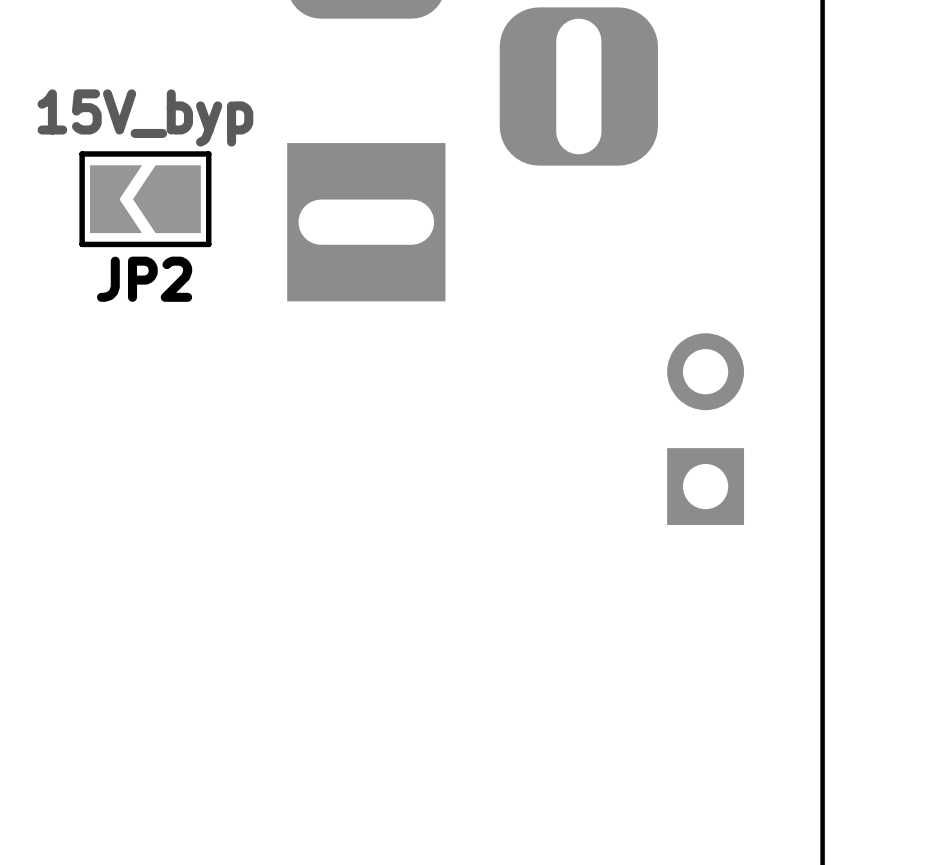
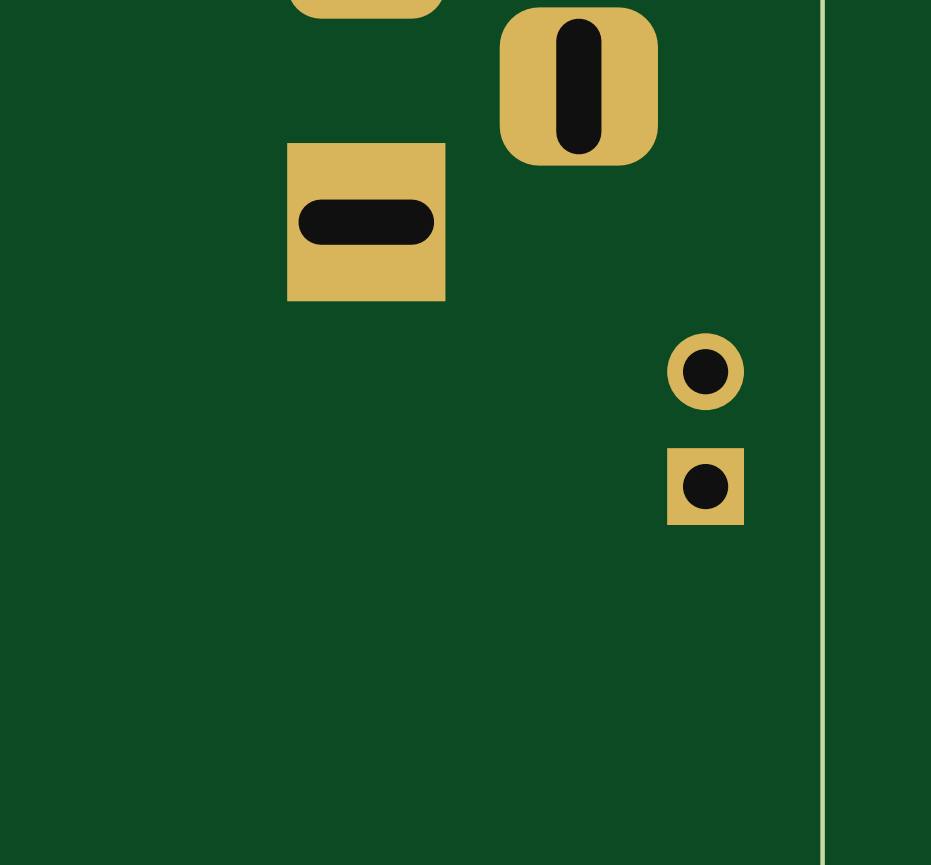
JP2: 15V_byp (145, 199) -> none

